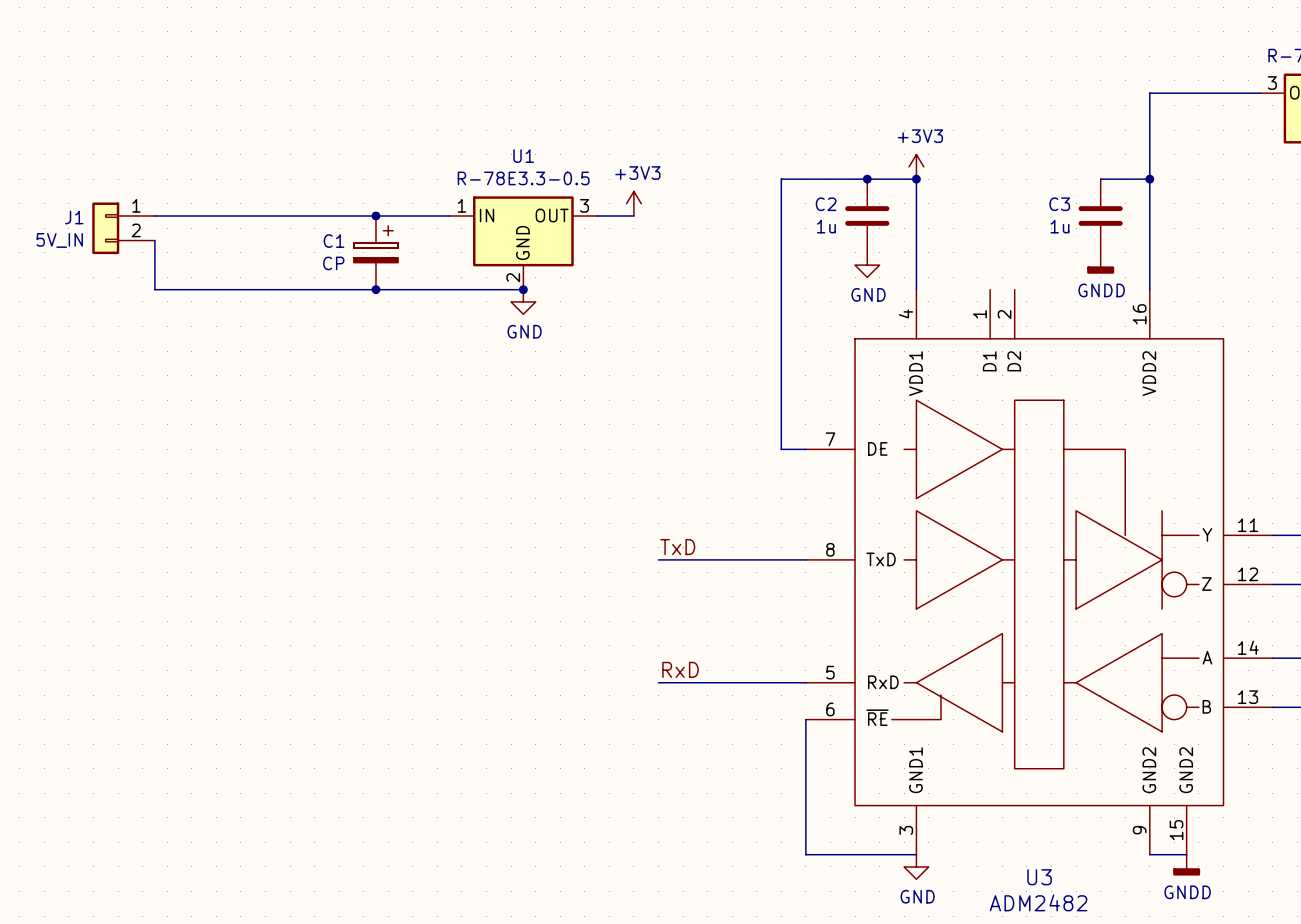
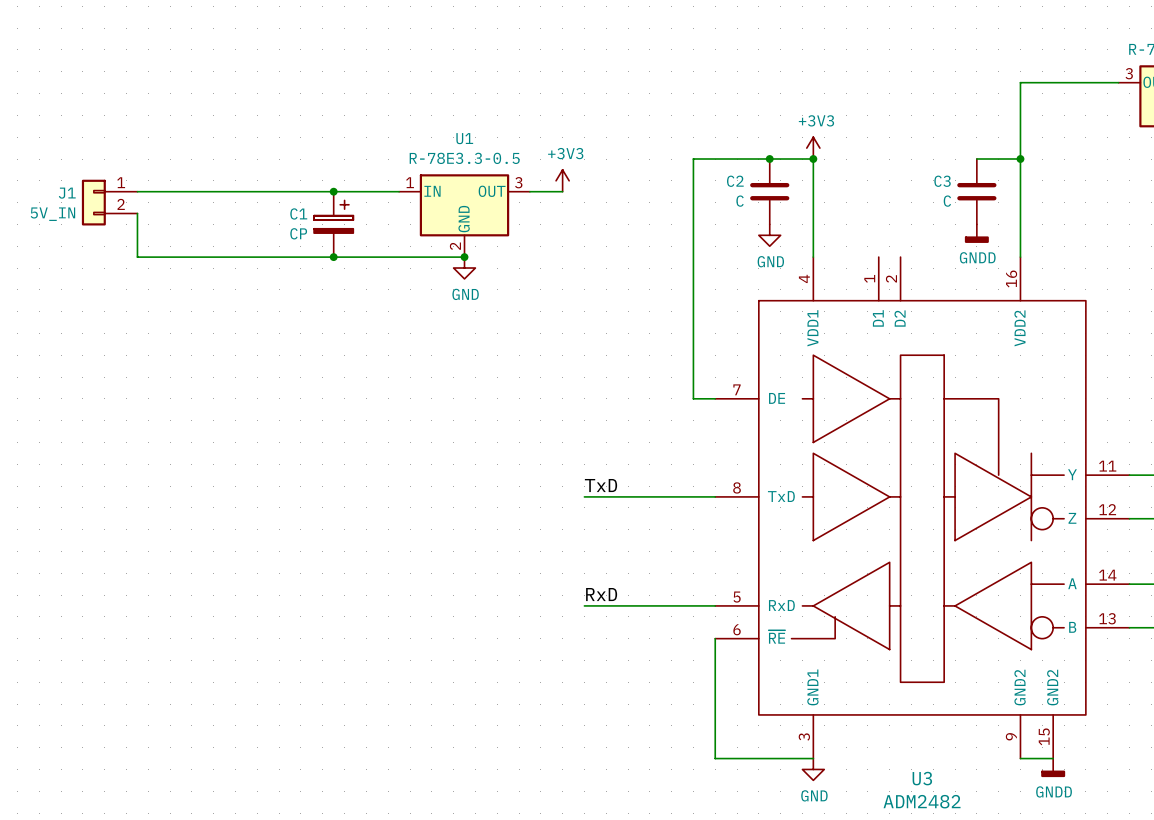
C2 value: 1u (826, 226) -> C (740, 201)
C3 value: 1u (1059, 226) -> C (947, 201)

